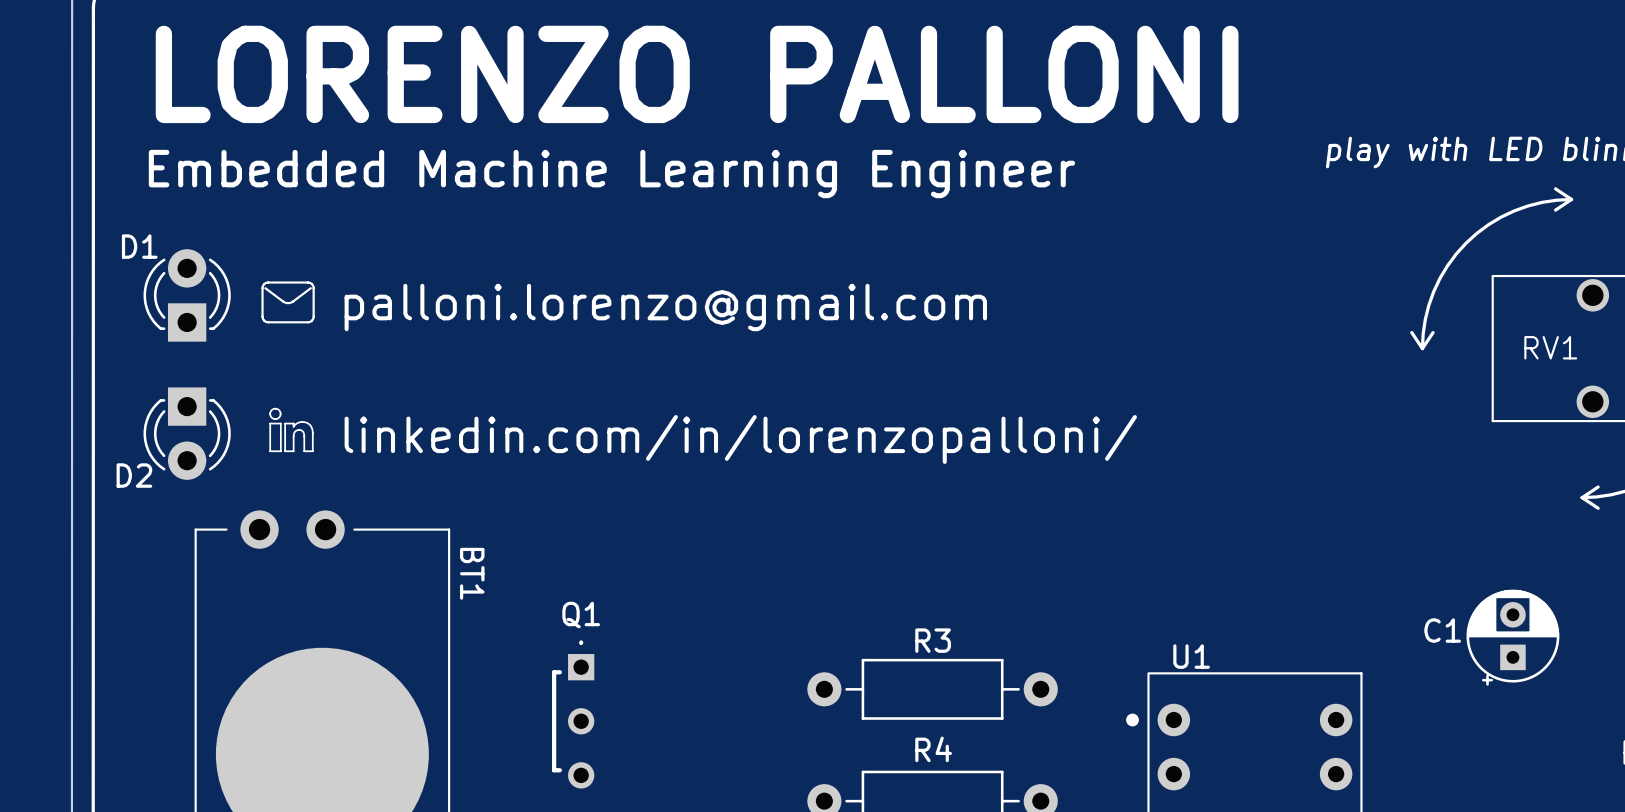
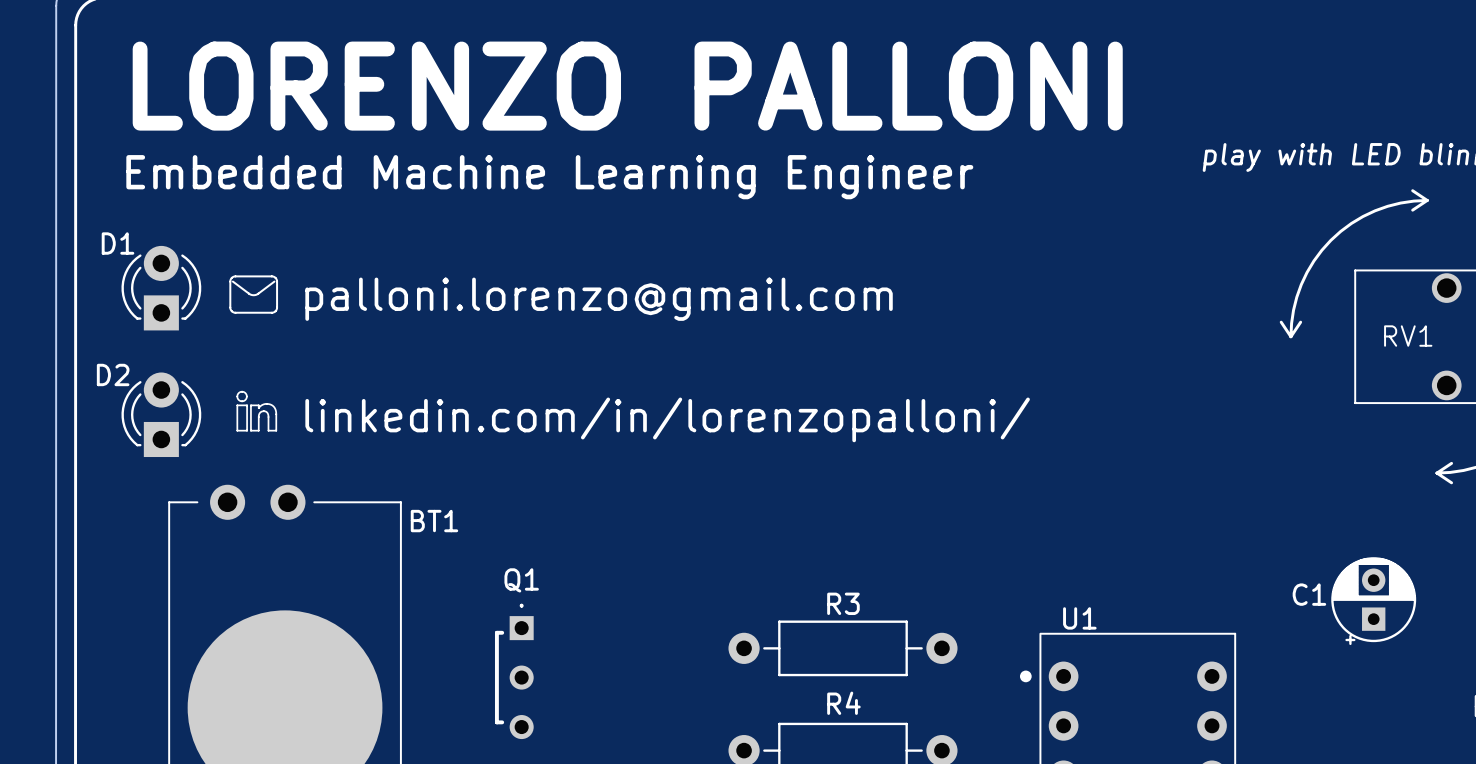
D2 rotation: 0° (187, 433) -> 180° (161, 414)
D2 name position: D2 (134, 475) -> D2 (113, 374)
BT1 name rotation: 0° (472, 573) -> 90° counterclockwise (434, 521)

